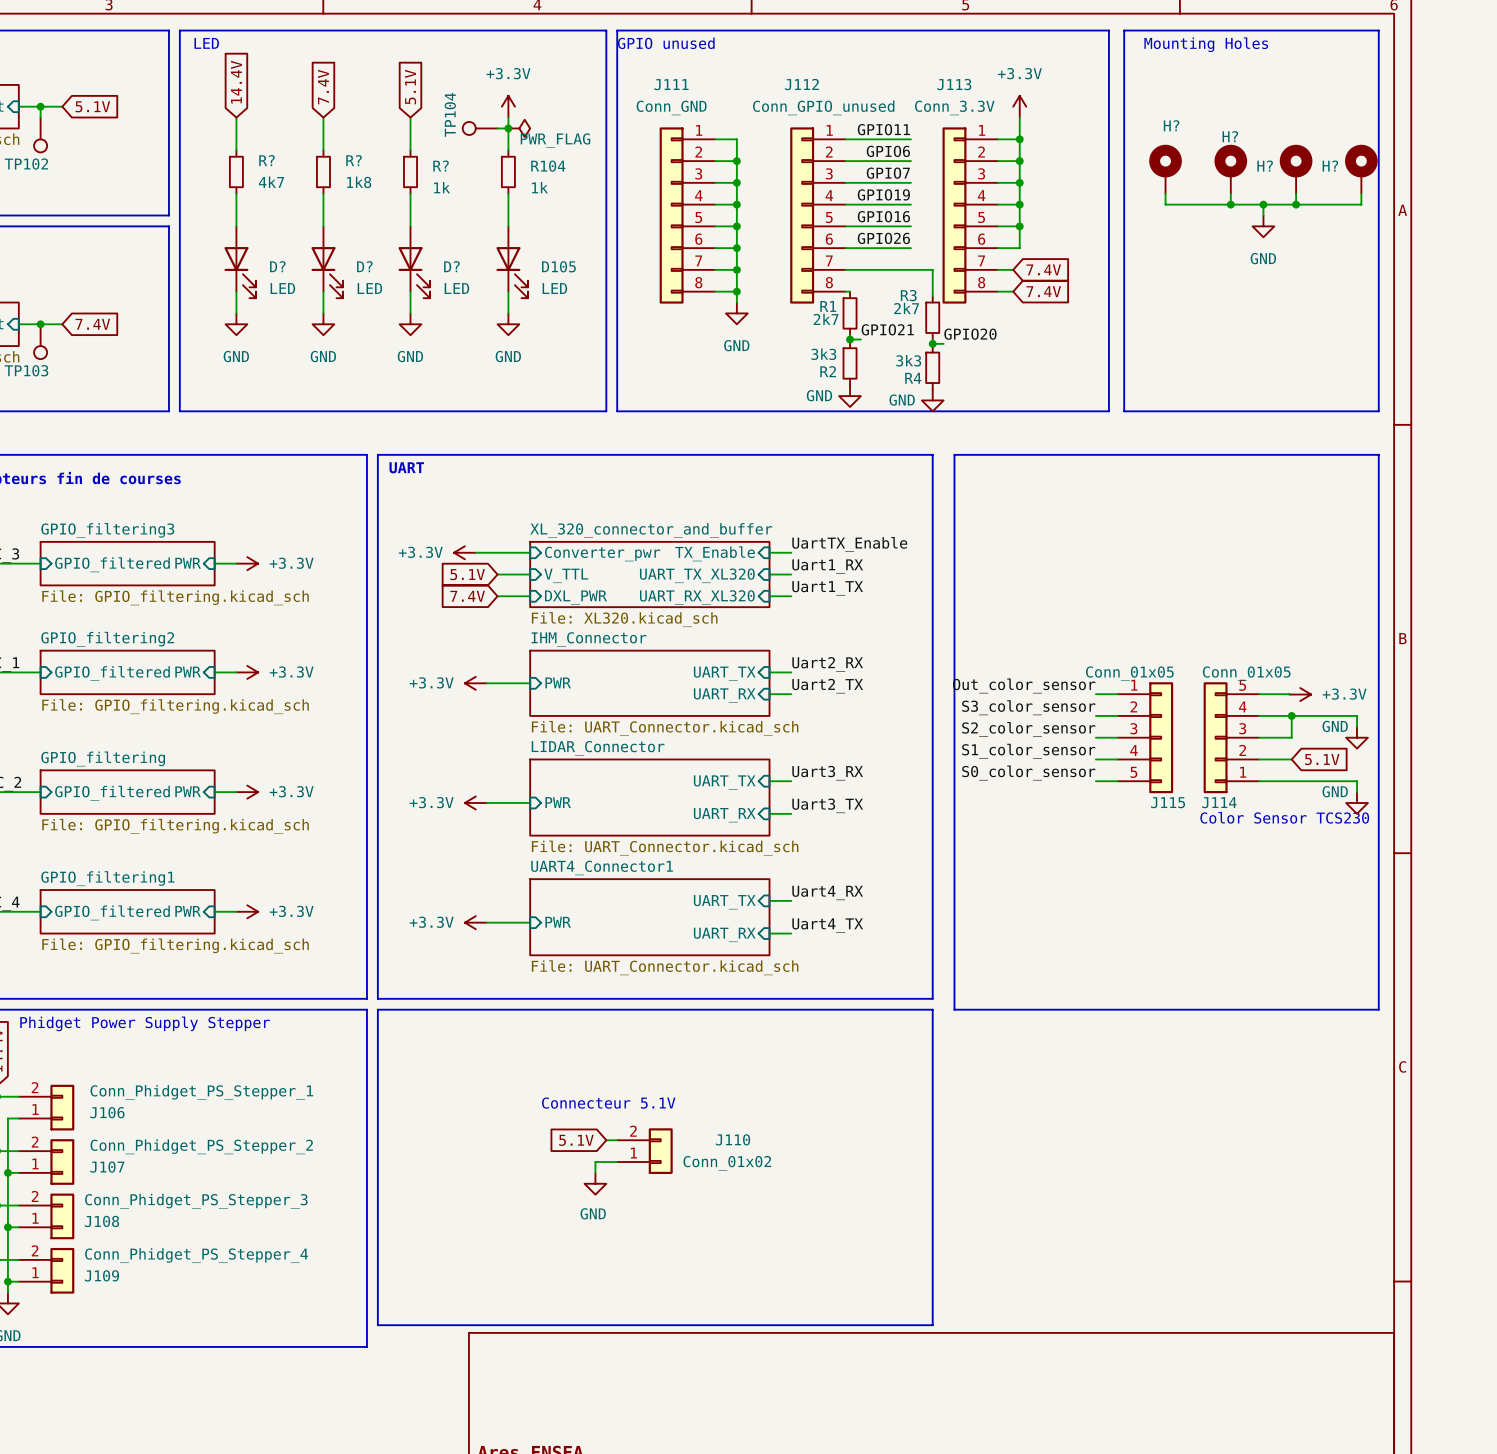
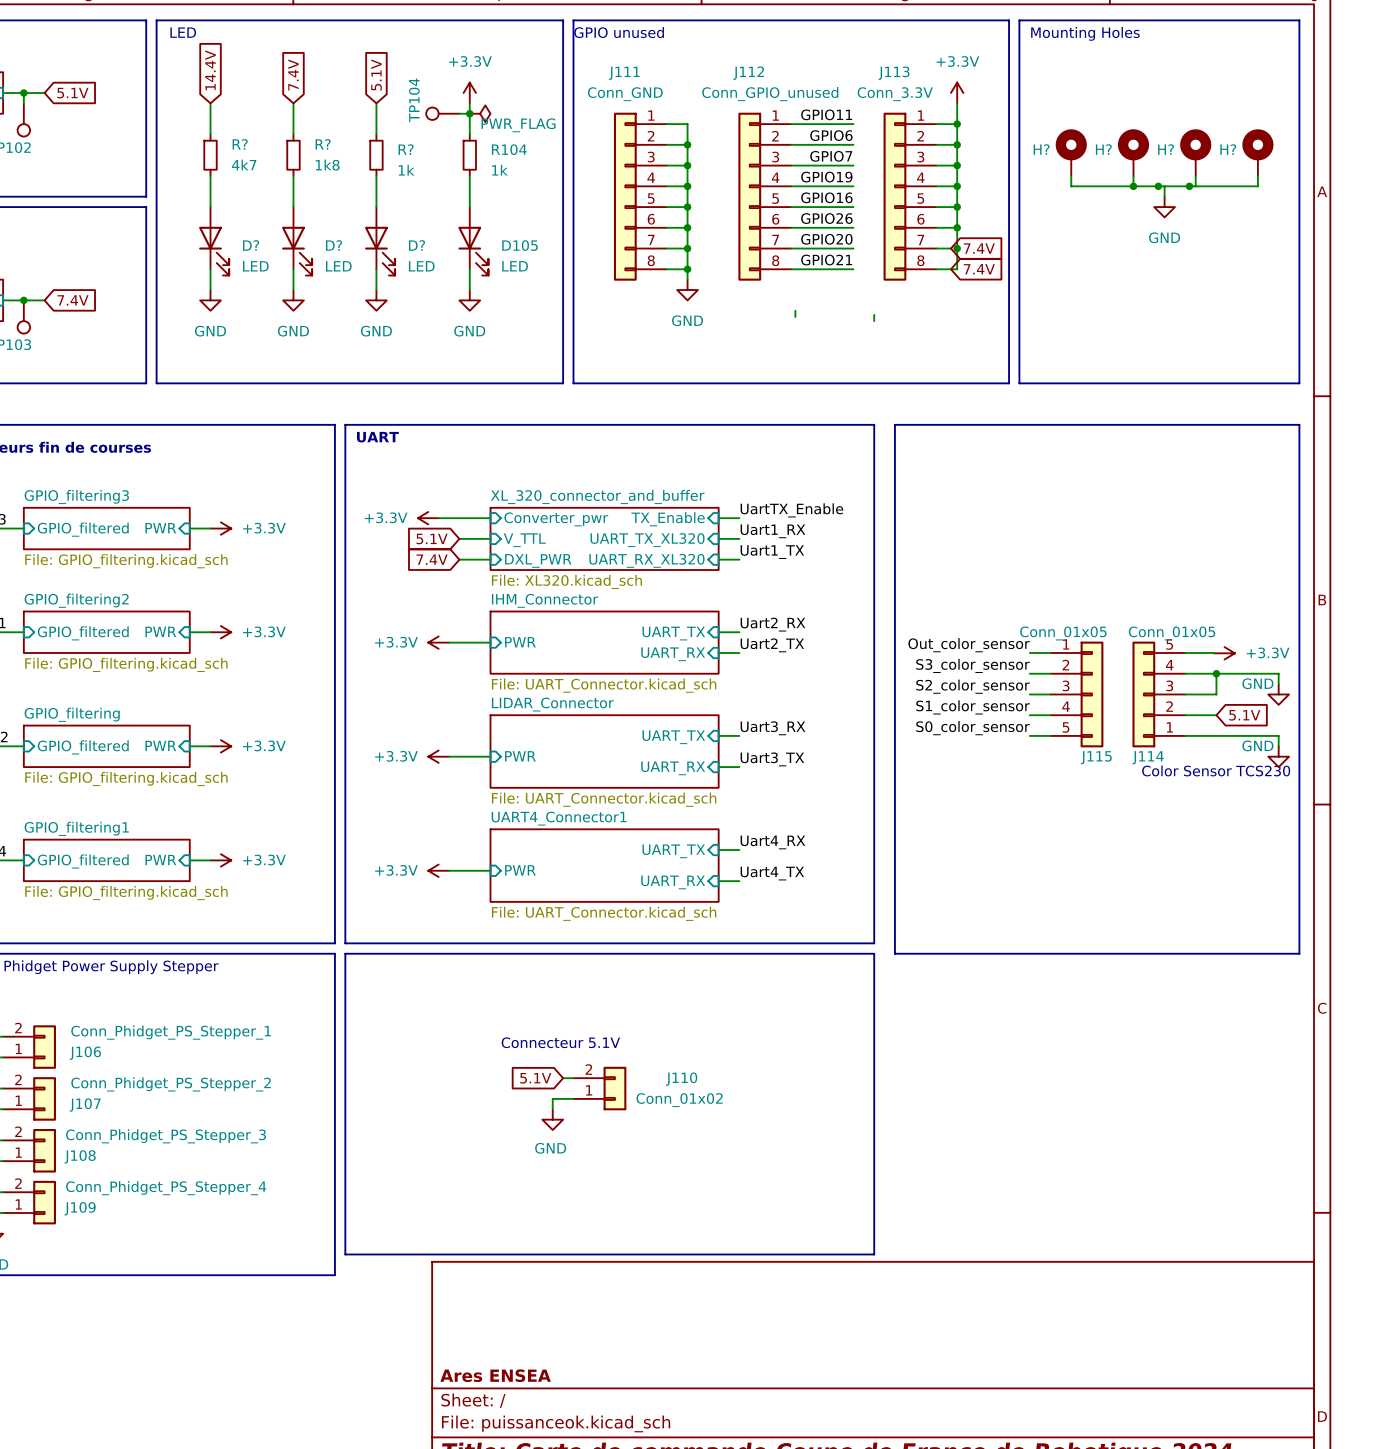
line: (1074, 30) (1085, 30) -> (1009, 20) (1009, 383)
line: (1108, 30) (1108, 411) -> (1042, 20) (1056, 20)
line: (1124, 30) (1124, 411) -> (1042, 383) (1056, 383)
text position: Mounting Holes (1206, 44) -> Mounting Holes (1085, 33)
H?: none -> (1071, 152)
H?: (1165, 169) -> none
H?: none -> (1133, 152)
H?: (1230, 169) -> none
H?: none -> (1195, 152)
H?: (1296, 169) -> none
H?: none -> (1257, 152)
H?: (1361, 169) -> none
wire: (1165, 193) (1165, 204) -> (1071, 175) (1071, 186) (1096, 186)
wire: (1230, 193) (1230, 204) -> (1133, 175) (1133, 186)
wire: (1296, 193) (1296, 204) -> (1195, 175) (1195, 186)
wire: (1361, 193) (1361, 204) (1335, 204) -> (1257, 175) (1257, 186)
junction: none -> (1133, 186)
wire: (1263, 204) (1263, 215) -> (1164, 186) (1164, 196)
junction: (1296, 204) -> none
power symbol position: GND (1263, 226) -> GND (1164, 207)
wire: none -> (957, 227) (957, 269) (950, 269)
junction: none -> (957, 227)
wire: (910, 269) (932, 269) (932, 296) -> none
junction: none -> (957, 248)
wire: none -> (795, 269) (853, 269)
R1: 2k7 (850, 313) -> none
R3: 2k7 (932, 317) -> none
label position: GPIO21 (887, 329) -> GPIO21 (826, 260)
label position: GPIO20 (970, 334) -> GPIO20 (826, 239)
wire: (850, 339) (860, 339) -> none
junction: (850, 339) -> none
wire: (932, 343) (943, 343) -> none
junction: (932, 343) -> none
R2: 3k3 (850, 363) -> none
R4: 3k3 (932, 367) -> none
power symbol: GND (850, 396) -> none
power symbol: GND (932, 400) -> none
line: (1074, 411) (1085, 411) -> (1019, 20) (1019, 383)

